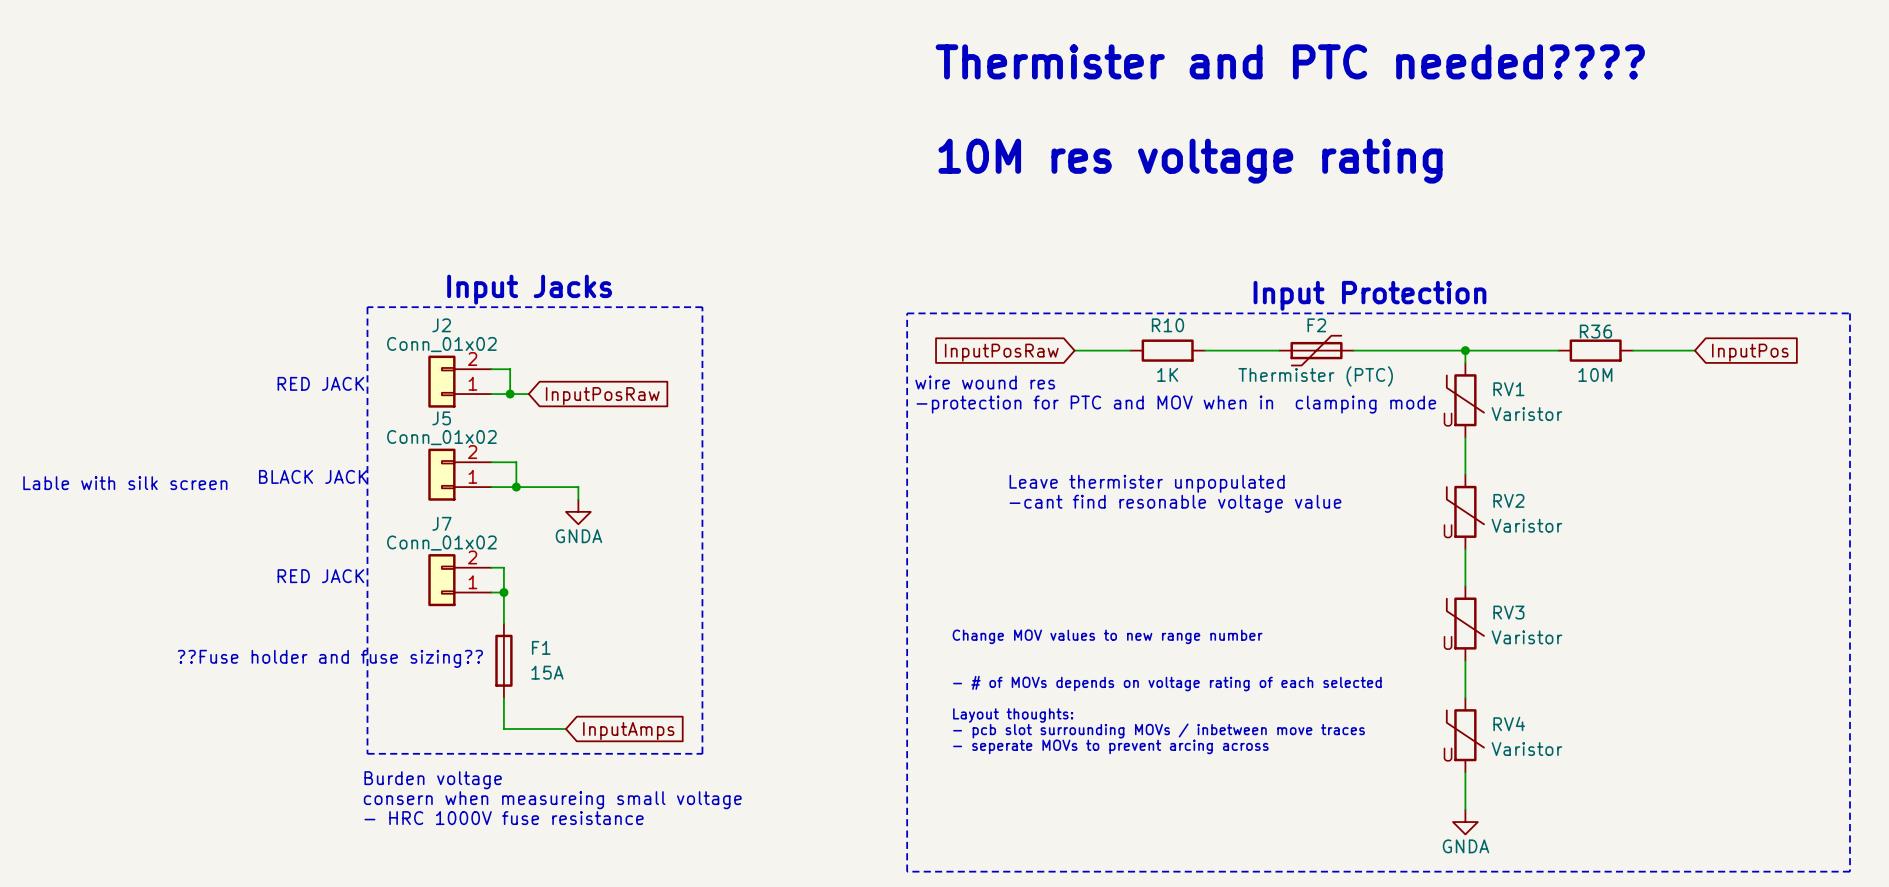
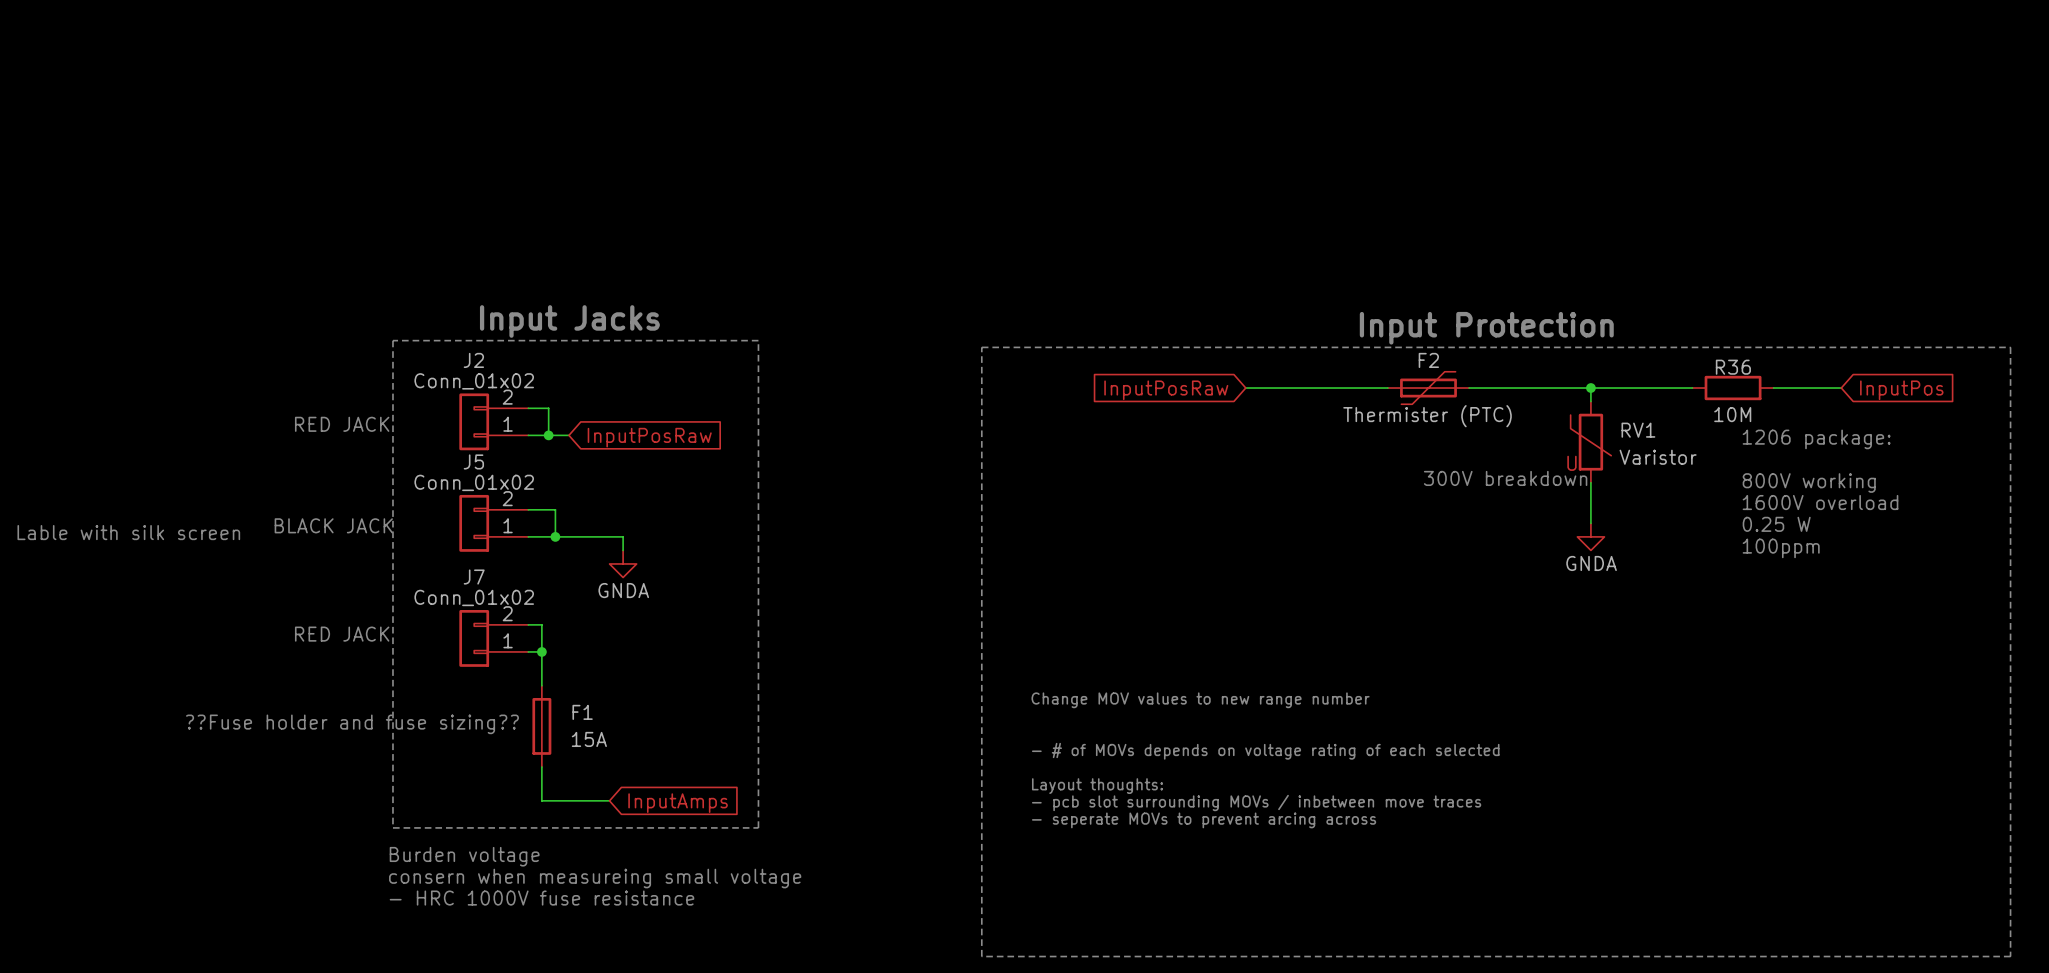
text: Thermister and PTC needed???? (1290, 61) -> none
text: 10M res voltage rating (1190, 161) -> none
wire: (1074, 350) (1130, 350) -> (1245, 388) (1306, 388)
R10: 1K (1167, 350) -> none
global label position: InputPosRaw (1001, 352) -> InputPosRaw (1166, 390)
text: wire wound res (985, 382) -> none
text: none -> 1206 package: (1816, 439)
text: -protection for PTC and MOV when in clamping mode (1176, 404) -> none
text: none -> 300V breakdown (1505, 478)
text: none -> 800V working (1809, 483)
text: none -> 1600V overload (1820, 502)
text: none -> 0.25 W (1776, 524)
text: Leave thermister unpopulated (1147, 483) -> none
power symbol: none -> GNDA (1590, 536)
text: none -> 100ppm (1781, 548)
text: -cant find resonable voltage value (1175, 503) -> none
RV2: Varistor (1465, 511) -> none
wire: (1465, 549) (1465, 586) -> none
RV3: Varistor (1465, 623) -> none
wire: (1465, 660) (1465, 697) -> none
RV4: Varistor (1465, 735) -> none
wire: (1465, 772) (1465, 809) -> none
power symbol: GNDA (1465, 822) -> none

